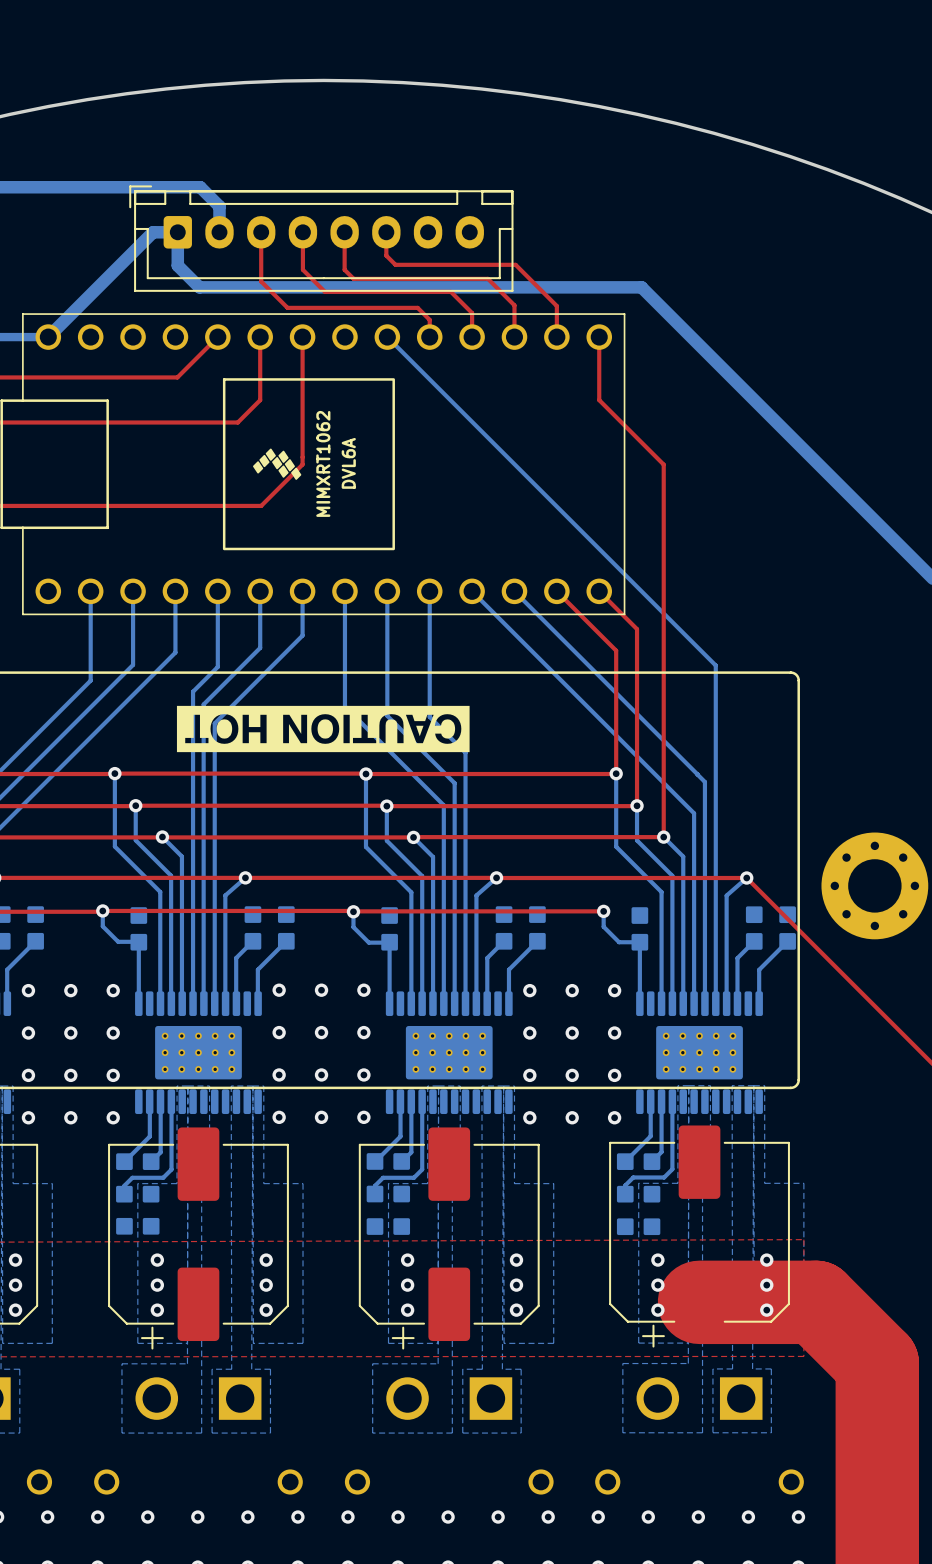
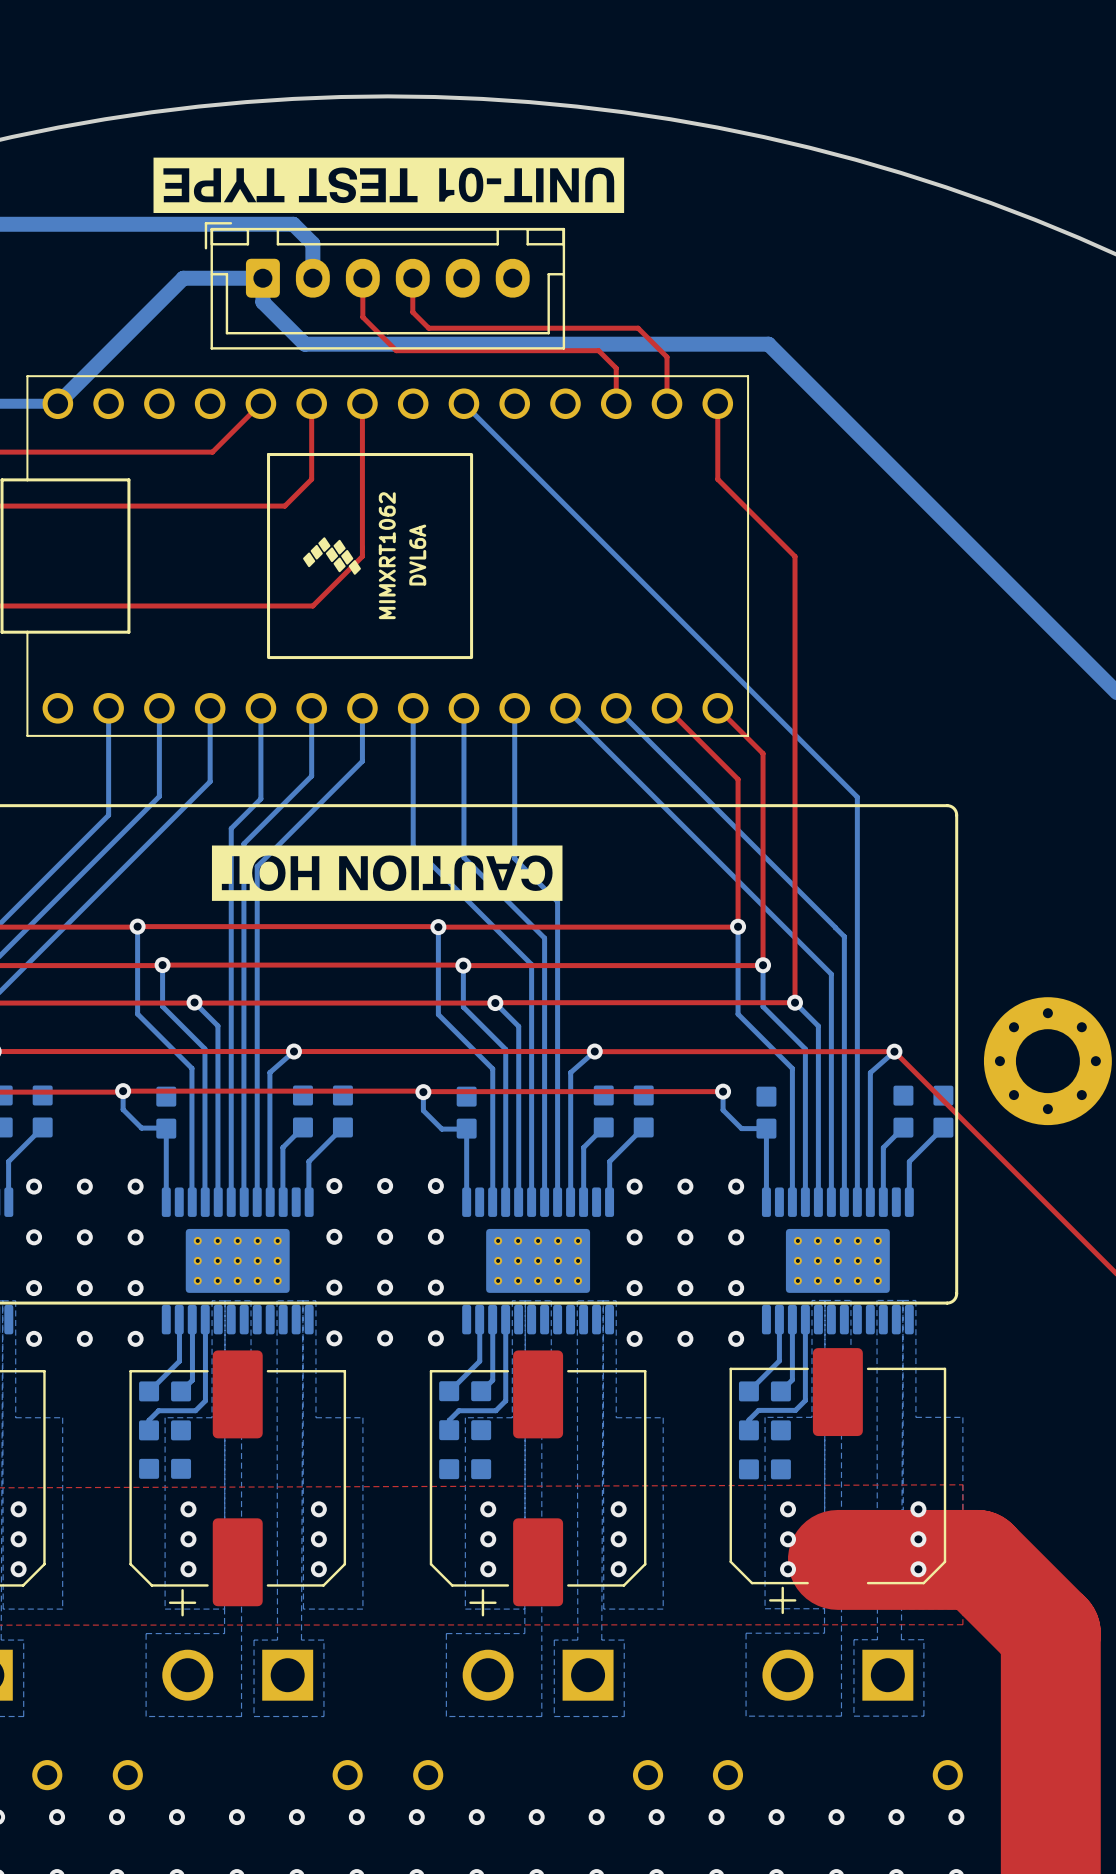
drawing: none -> [153, 157, 625, 214]
part footprint: [129, 185, 514, 292] -> [204, 222, 566, 350]
bottom track: (200, 187) (219, 206) (219, 232) -> (239, 224) (293, 224) (312, 243) (312, 278)
bottom track: (177, 232) (177, 265) (199, 287) (254, 287) -> (212, 278) (262, 278) (262, 302) (304, 344)
top track: (261, 232) (261, 281) (287, 307) (417, 307) (429, 319) (429, 337) -> none
top track: (386, 232) (386, 255) (395, 264) (515, 264) (556, 306) -> (412, 312) (428, 328) (638, 328) (667, 357) (667, 366)
top track: (344, 260) (344, 269) (353, 278) (487, 278) (514, 307) -> (362, 317) (396, 350) (598, 350) (616, 368)
top track: (302, 264) (302, 269) (324, 291) (450, 291) (472, 313) (472, 337) -> none

